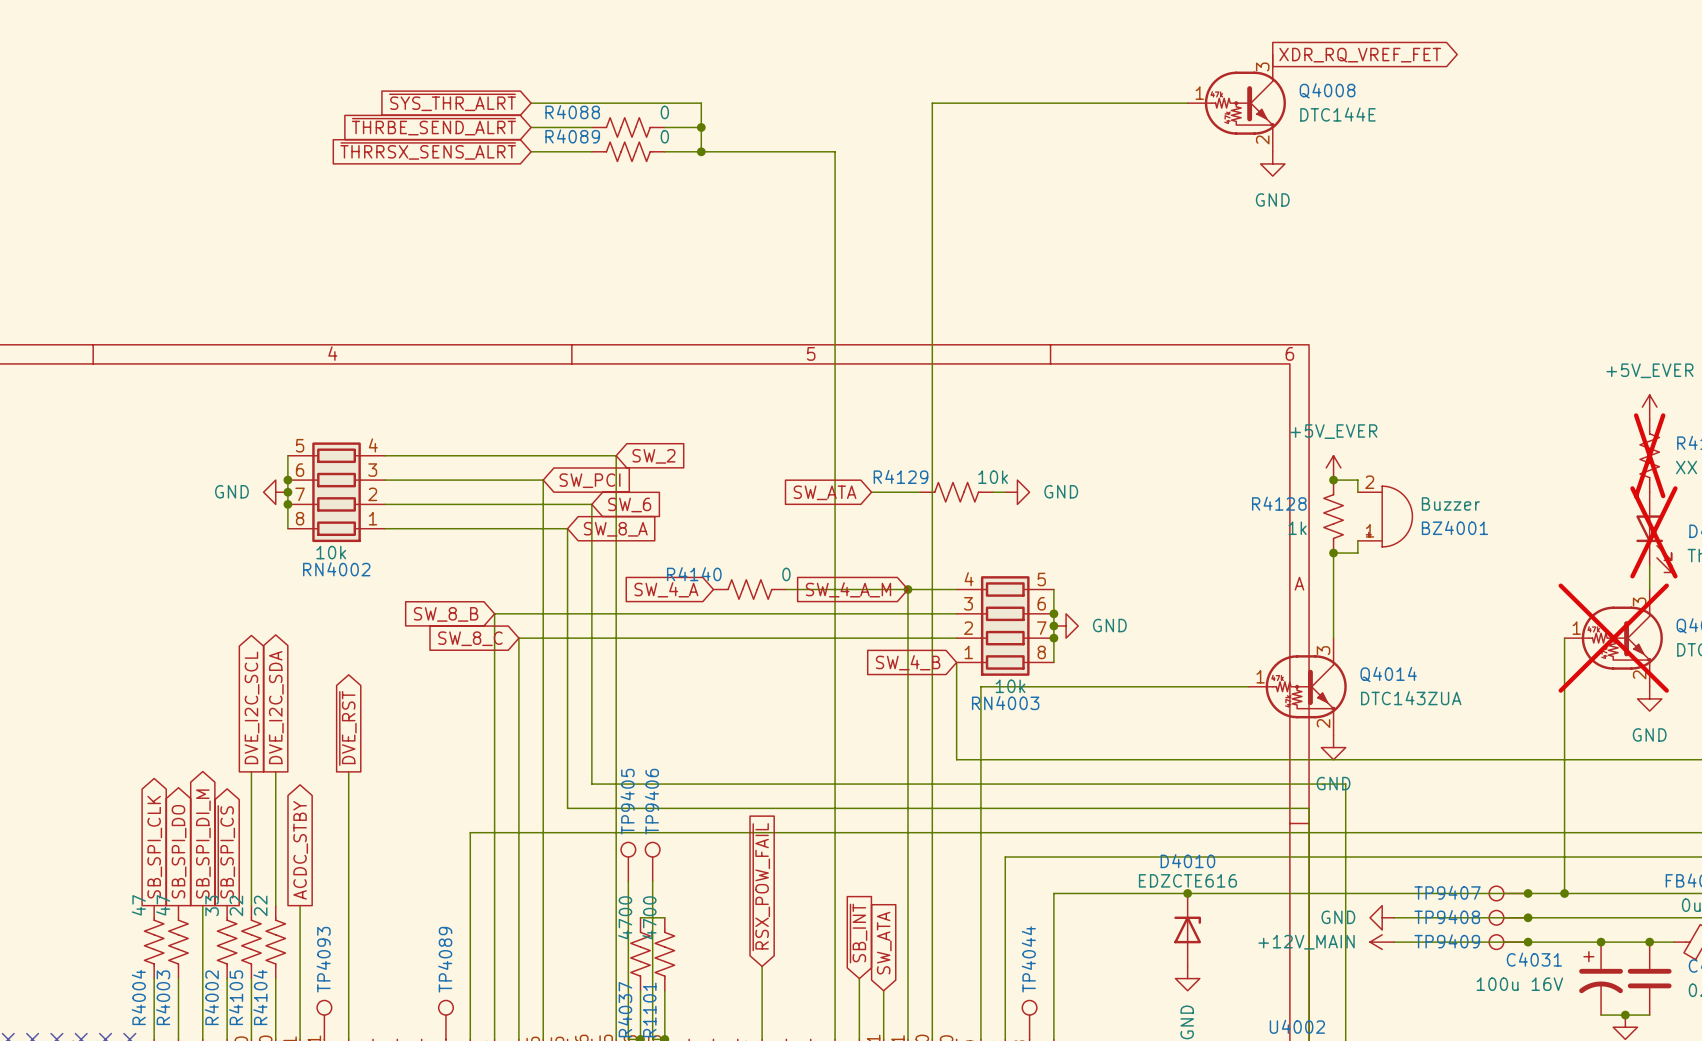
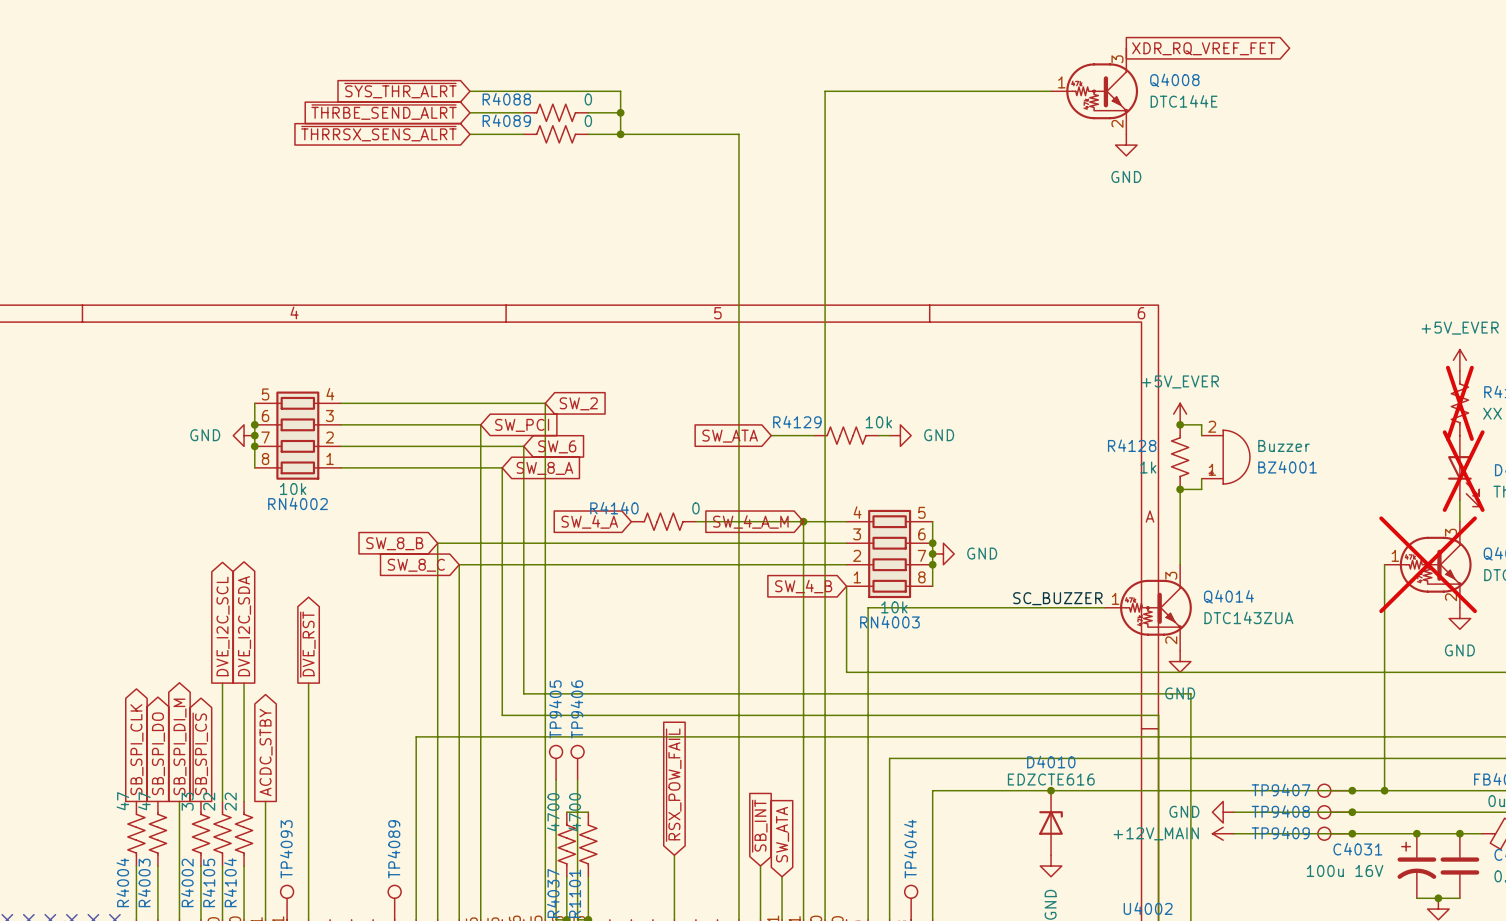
label: none -> SC_BUZZER (1057, 598)

